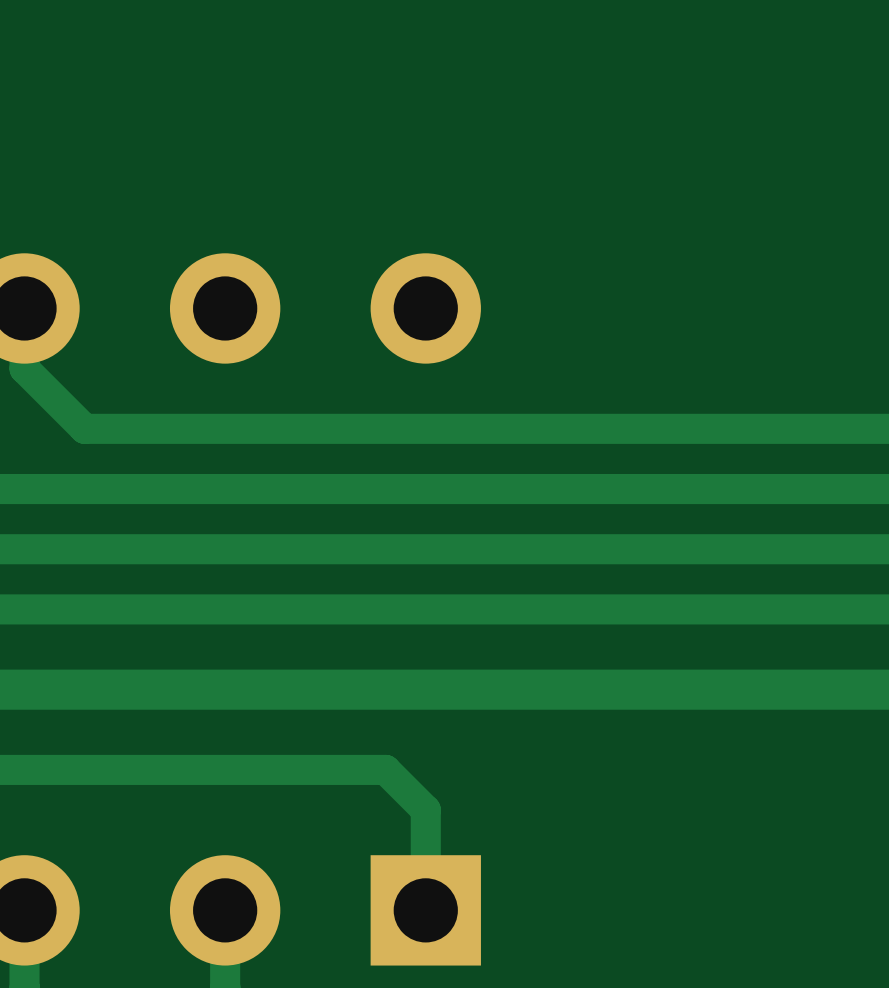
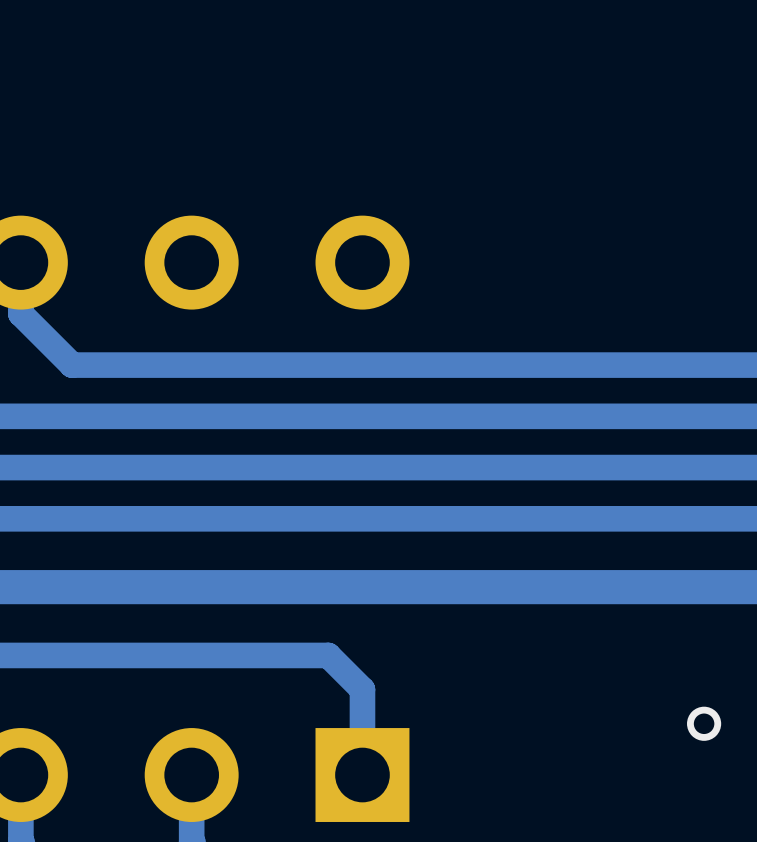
via: none -> (704, 723)

